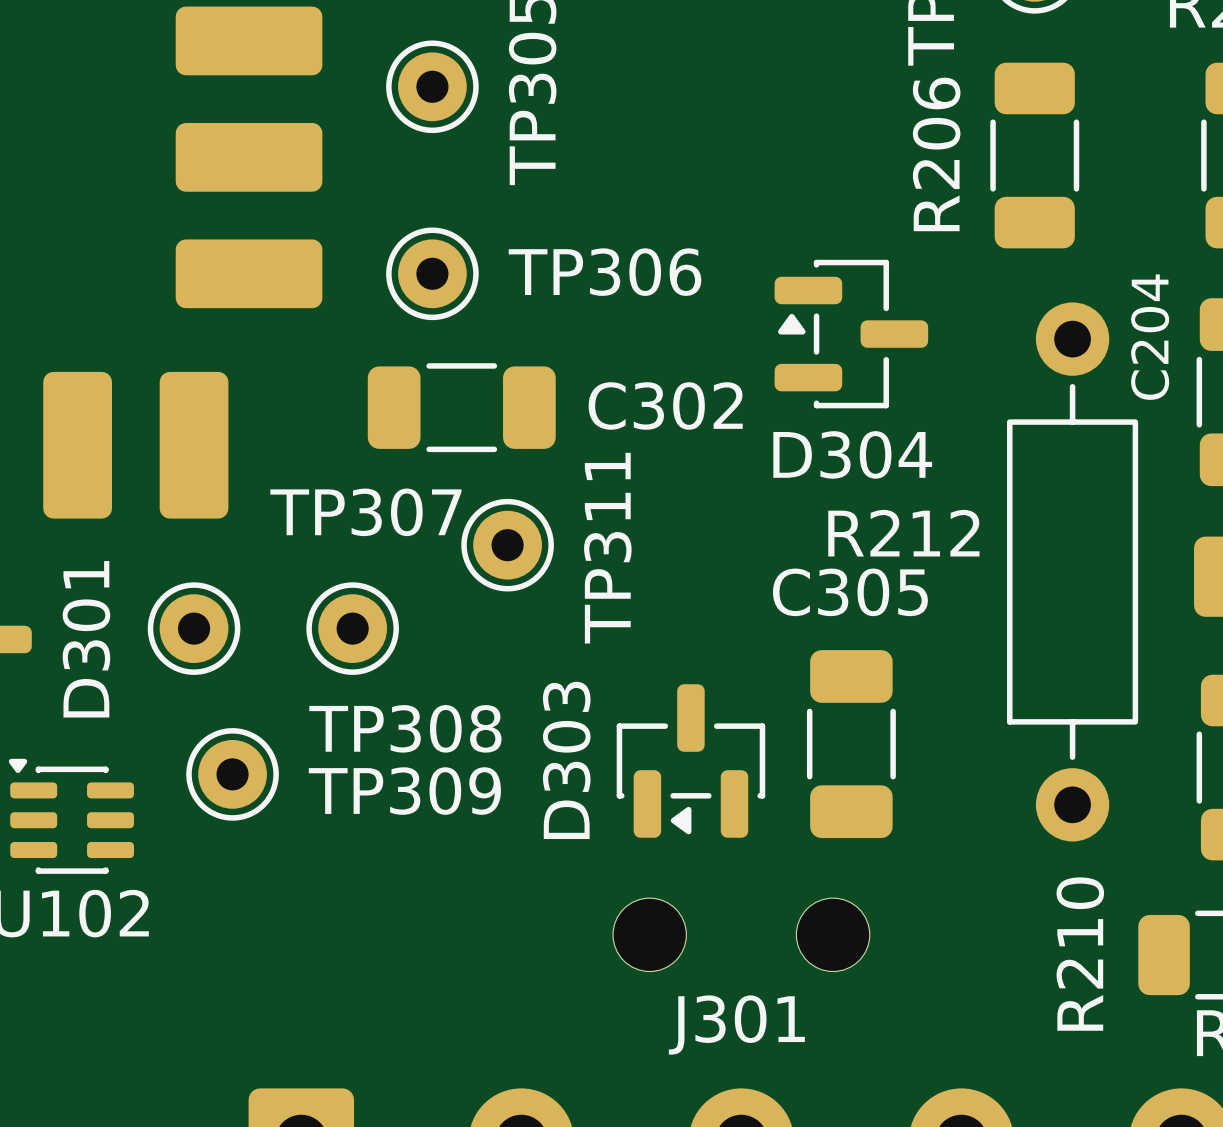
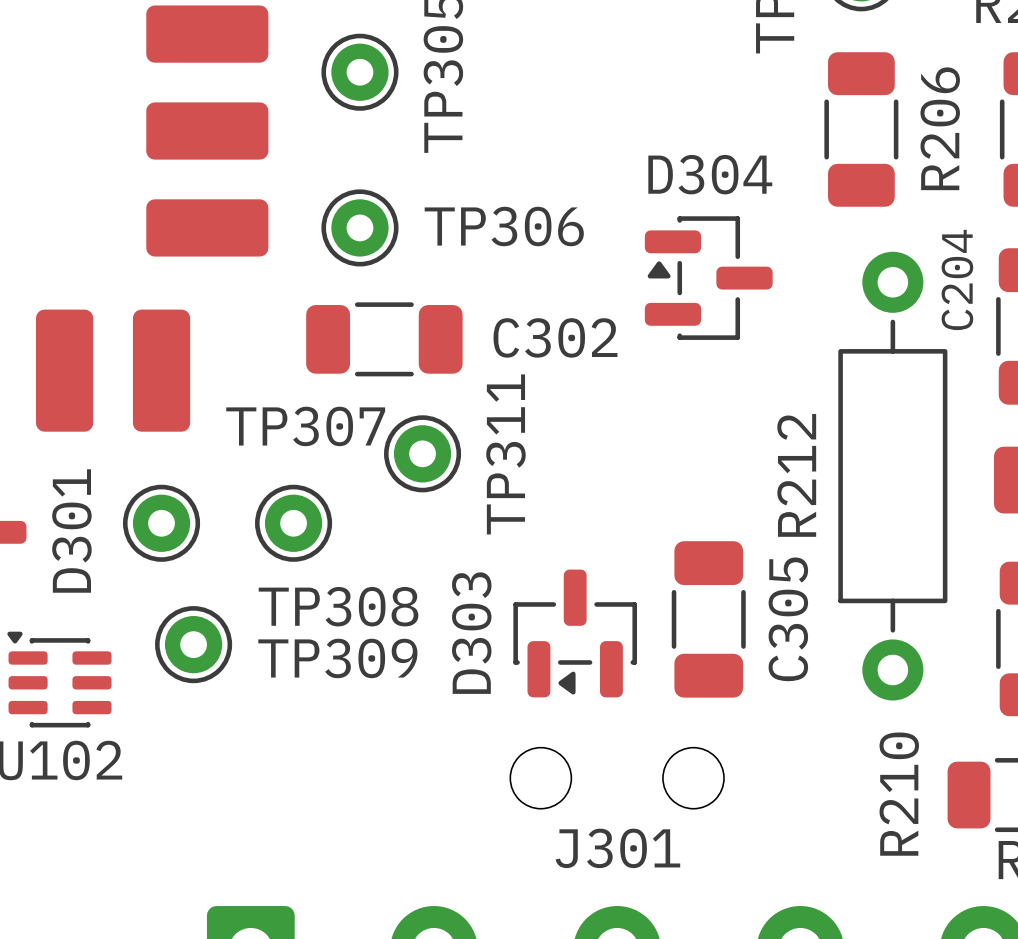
R206 name position: R206 (936, 154) -> R206 (940, 128)
D304 name position: D304 (852, 454) -> D304 (710, 174)
R212 name rotation: 0° (903, 533) -> 90° counterclockwise (796, 475)
C305 name rotation: 0° (850, 592) -> 90° counterclockwise (788, 619)

